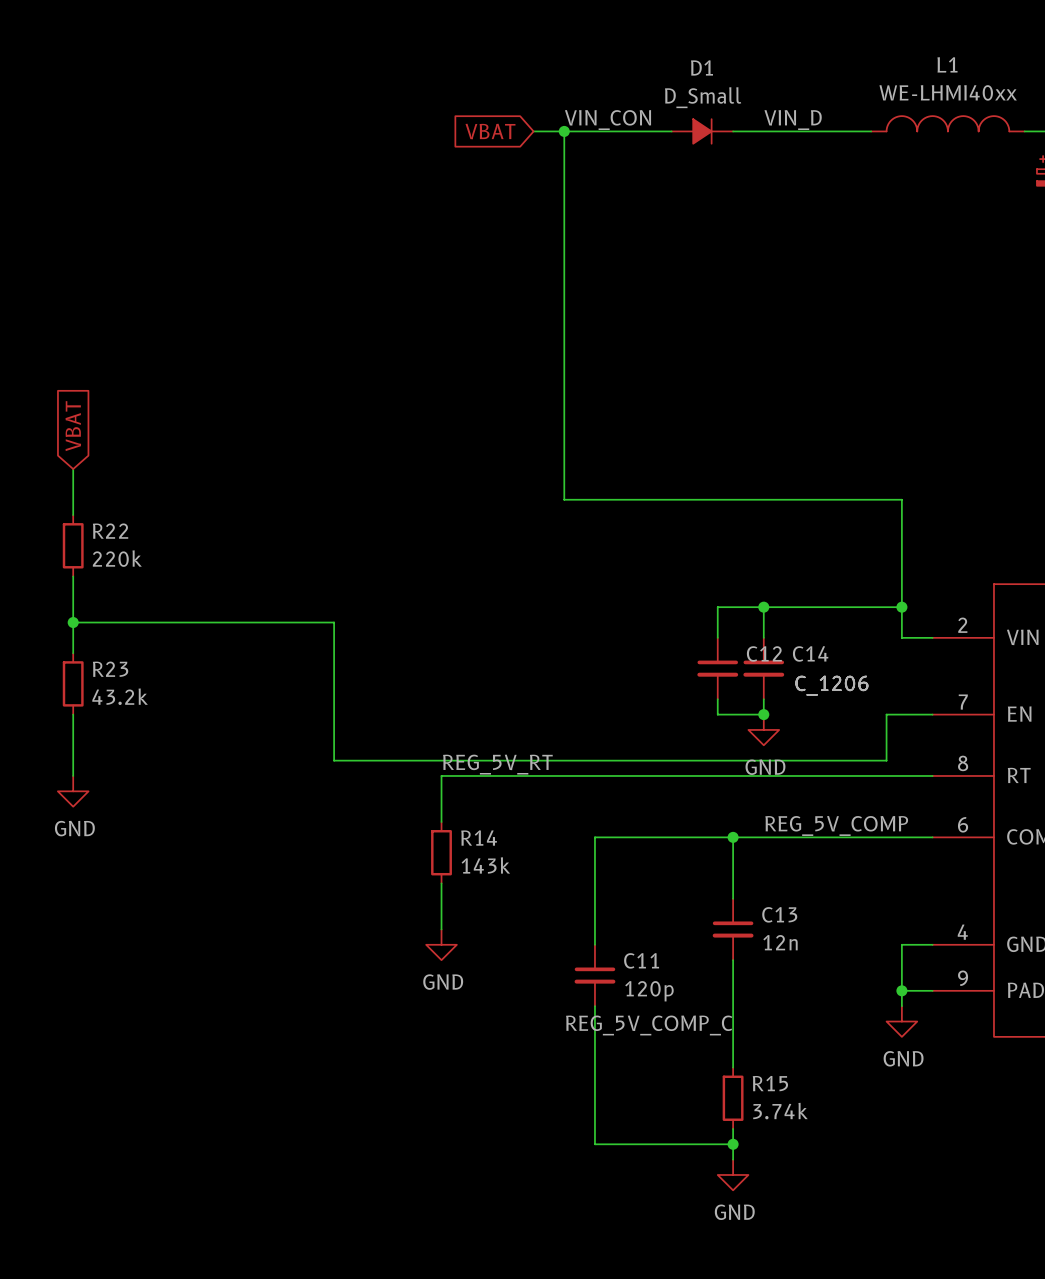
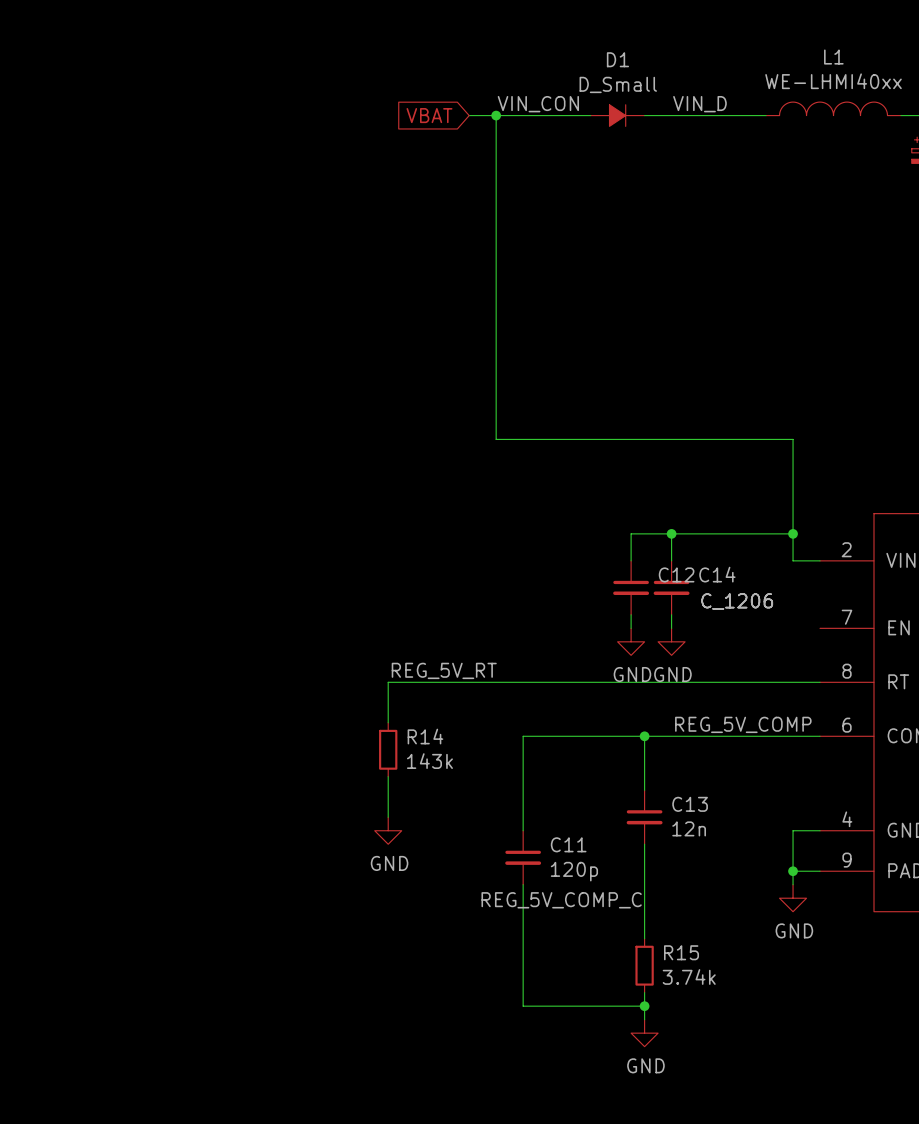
global label: VBAT (73, 426) -> none
wire: (73, 469) (73, 515) -> none
R22: 220k (73, 545) -> none
wire: (73, 576) (73, 653) -> none
wire: (73, 622) (334, 622) (334, 760) (886, 760) (886, 714) (932, 714) -> none
junction: (73, 622) -> none
R23: 43.2k (73, 683) -> none
wire: (73, 714) (73, 775) -> none
wire: (717, 714) (763, 714) -> none
junction: (763, 714) -> none
power symbol: none -> GND (631, 641)
power symbol: GND (73, 791) -> none

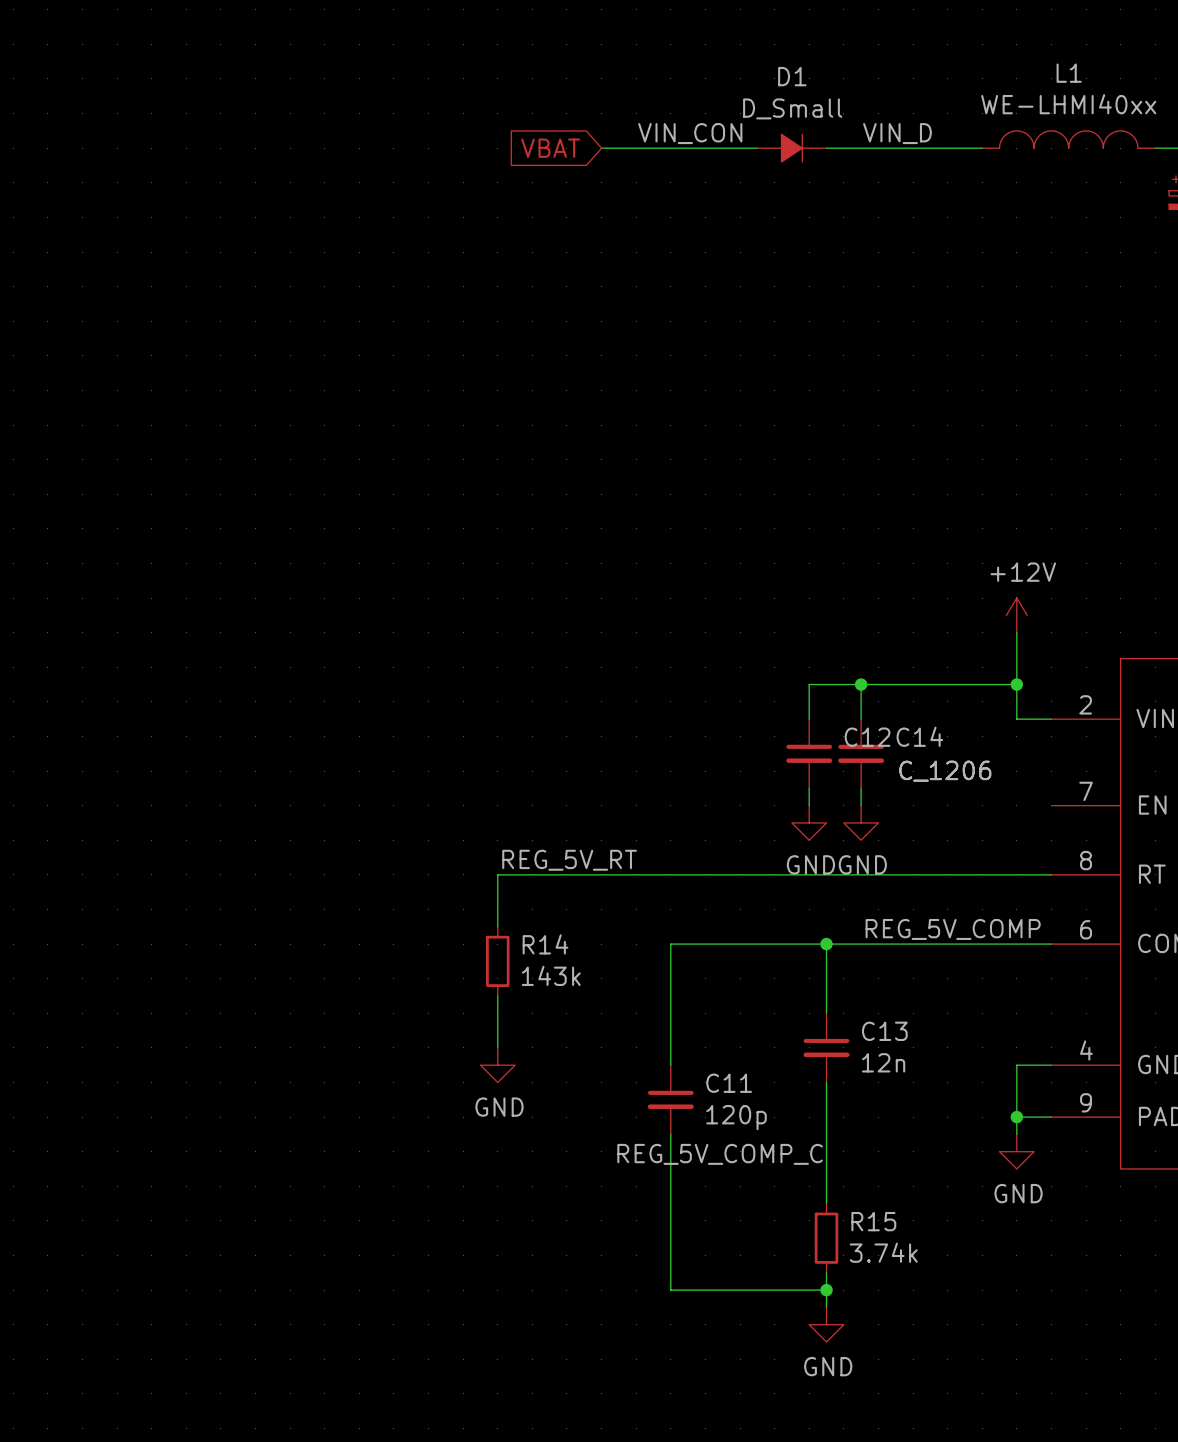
wire: (496, 115) (496, 439) (793, 439) (793, 493) -> none
junction: (496, 115) -> none
power symbol: none -> +12V (1016, 615)

